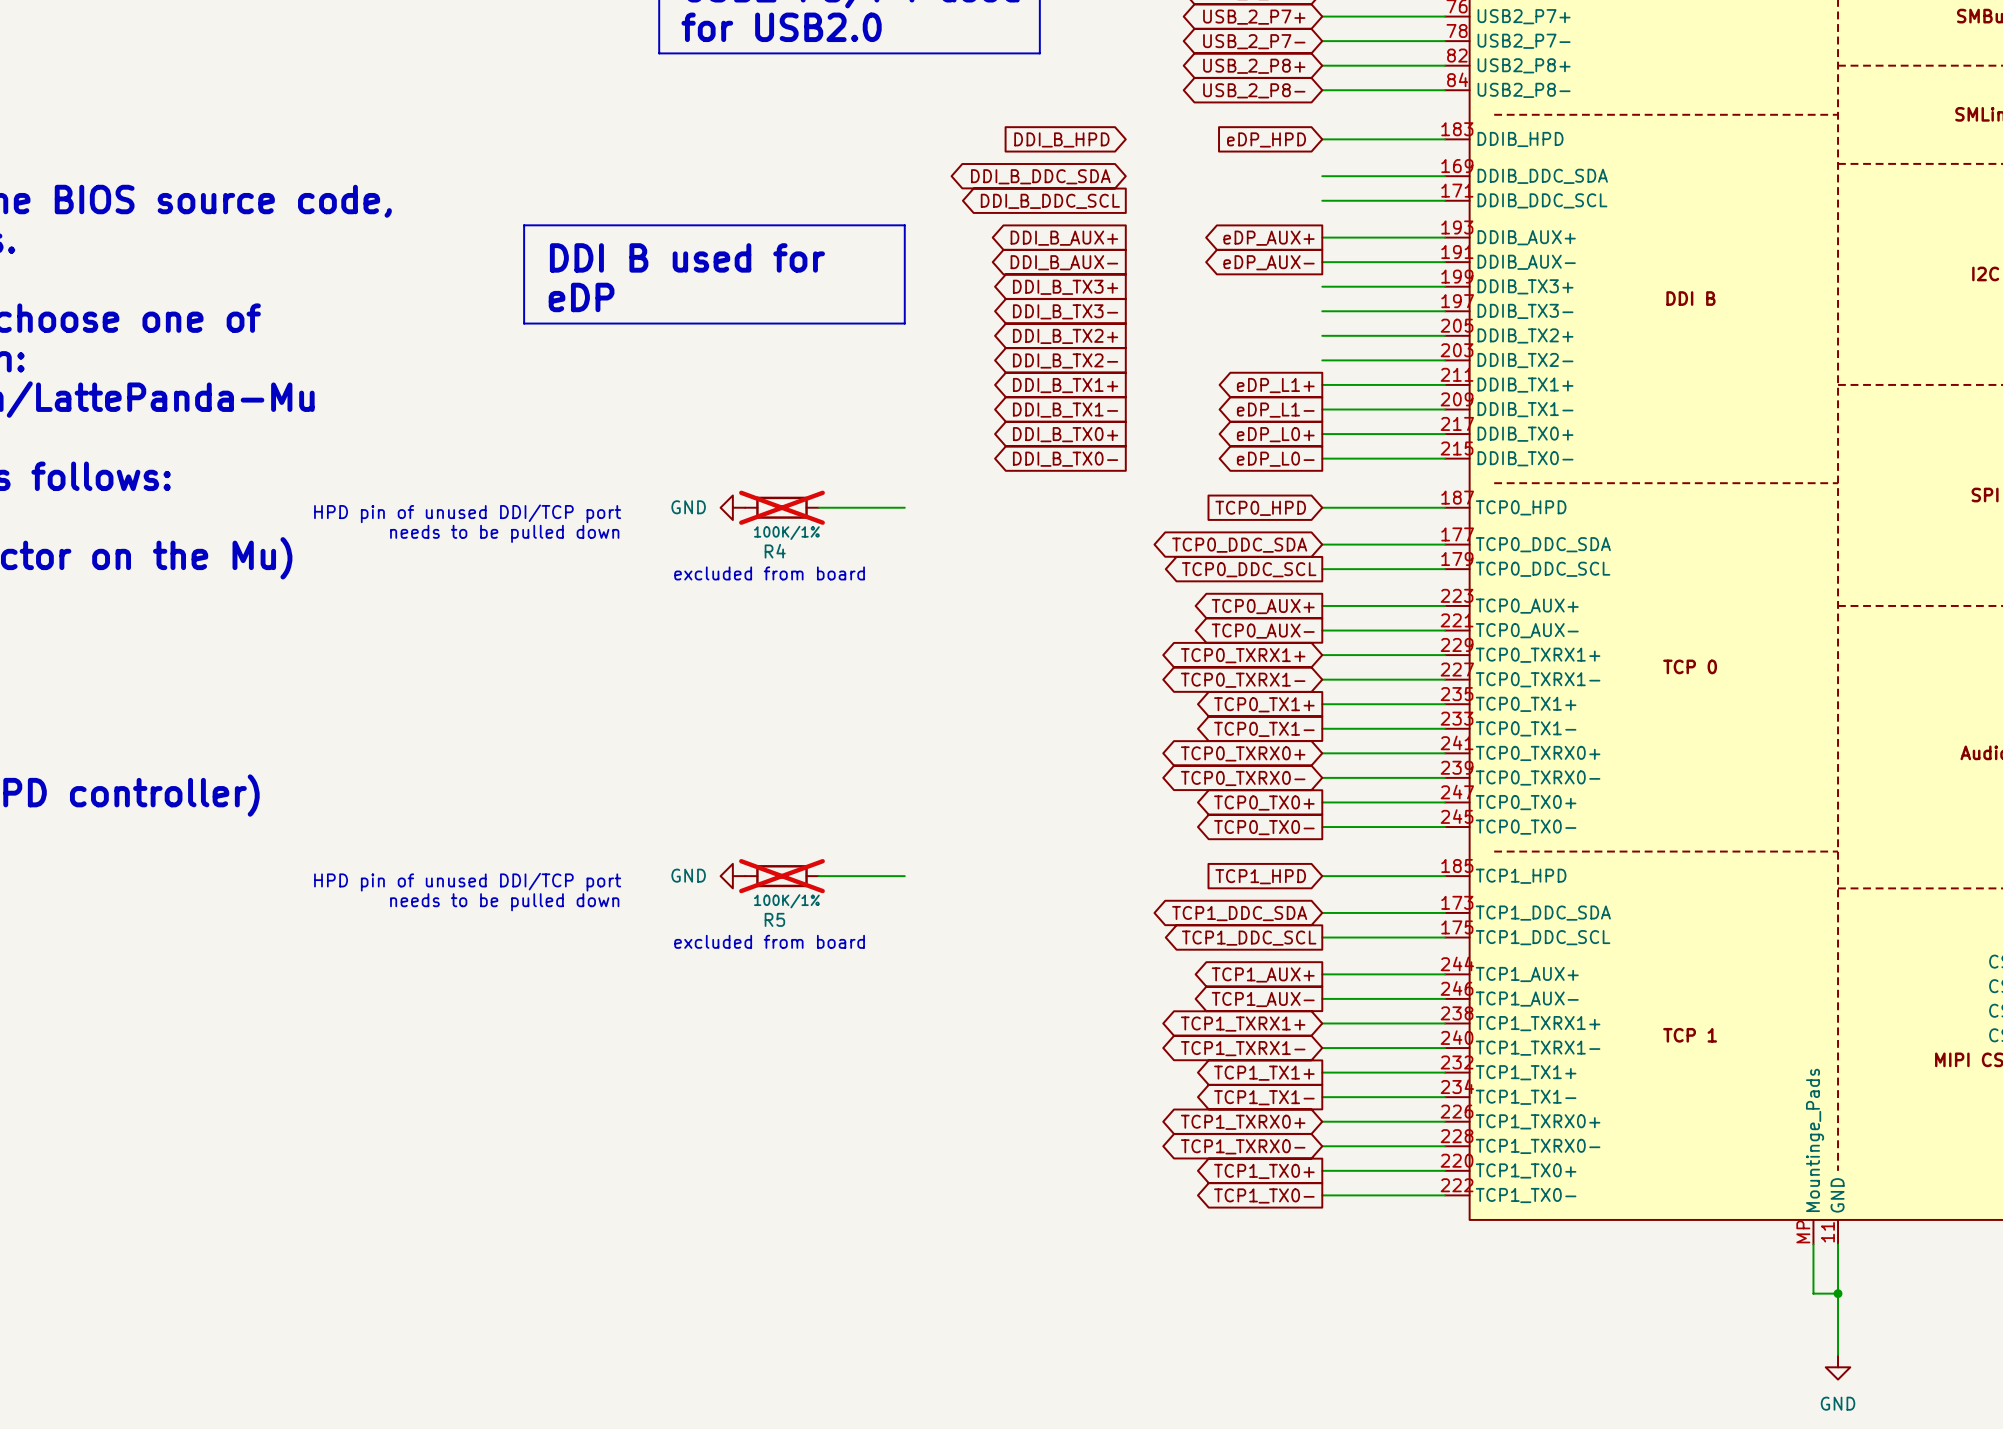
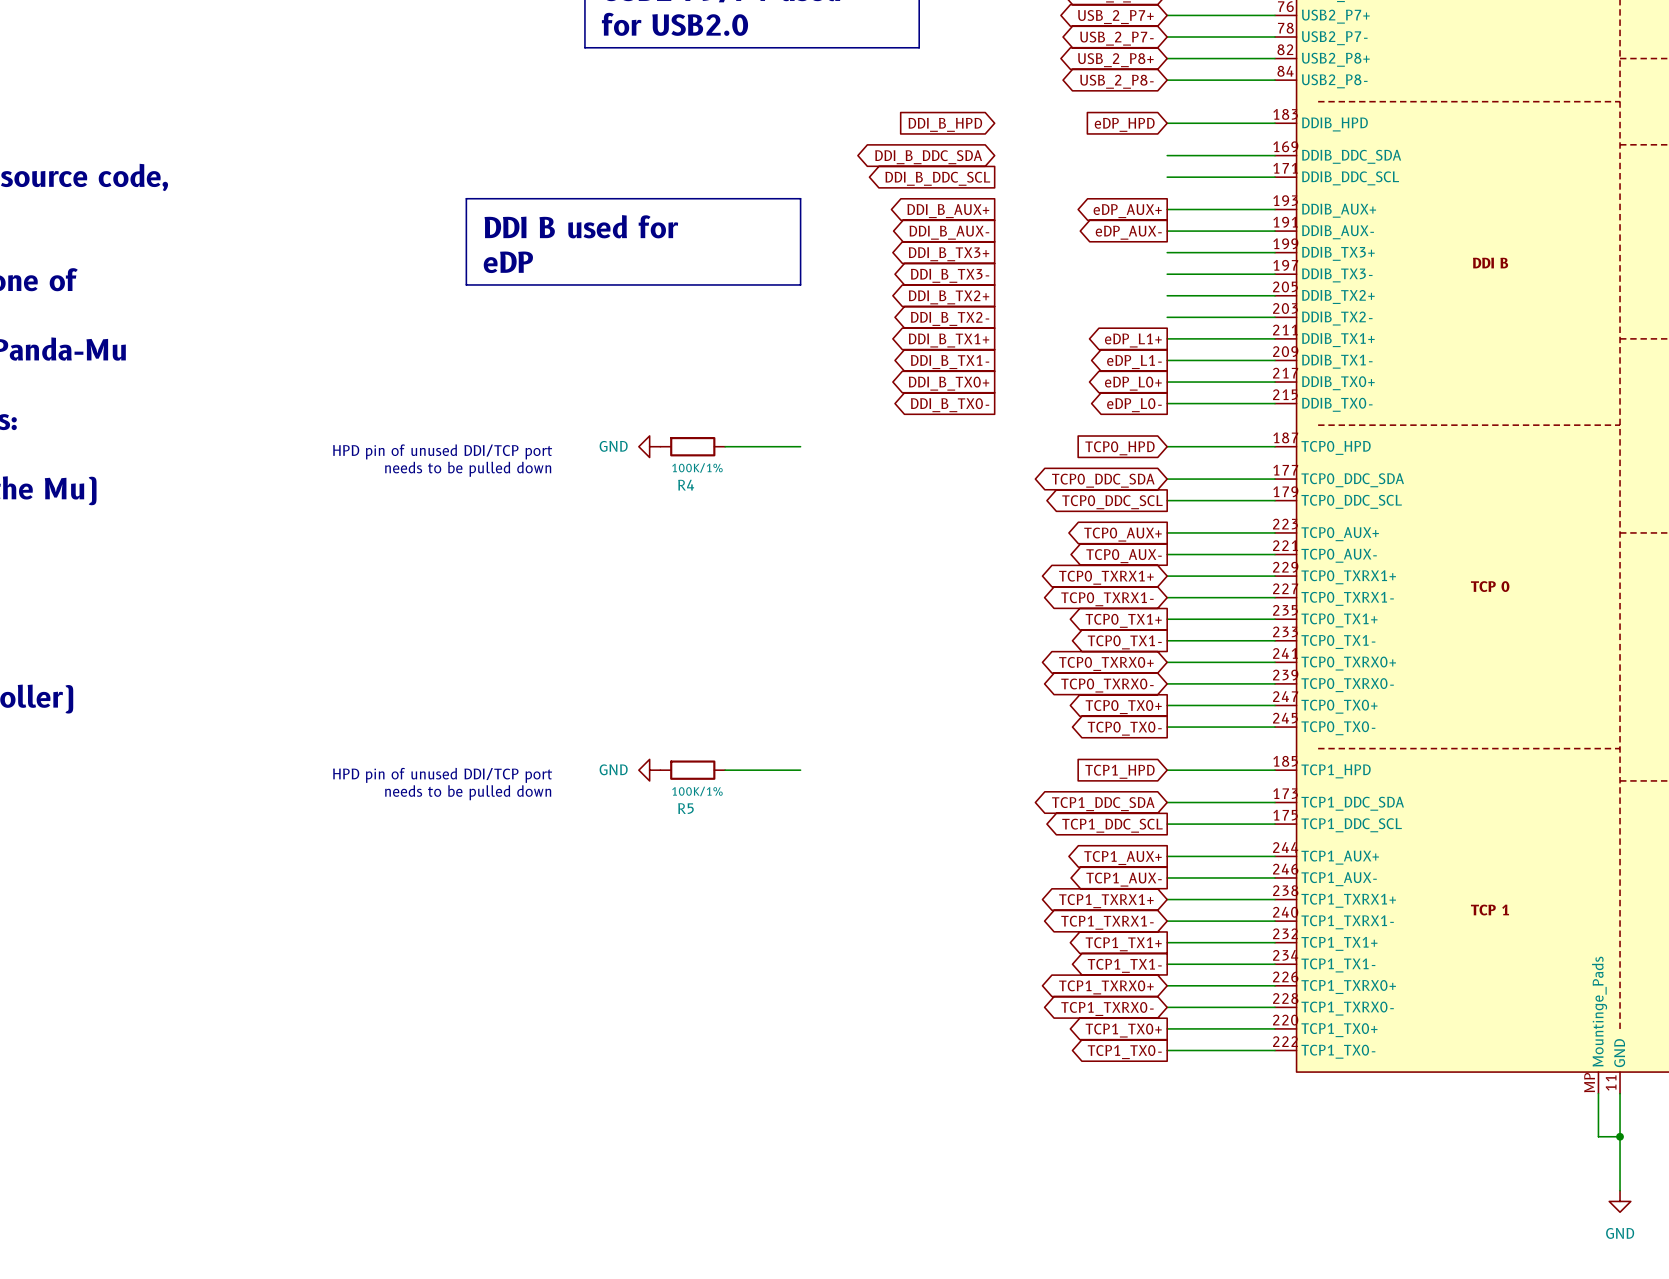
R4 do-not-place cross: (781, 507) -> none
text: excluded from board (769, 573) -> none
R5 do-not-place cross: (781, 876) -> none
text: excluded from board (769, 941) -> none

